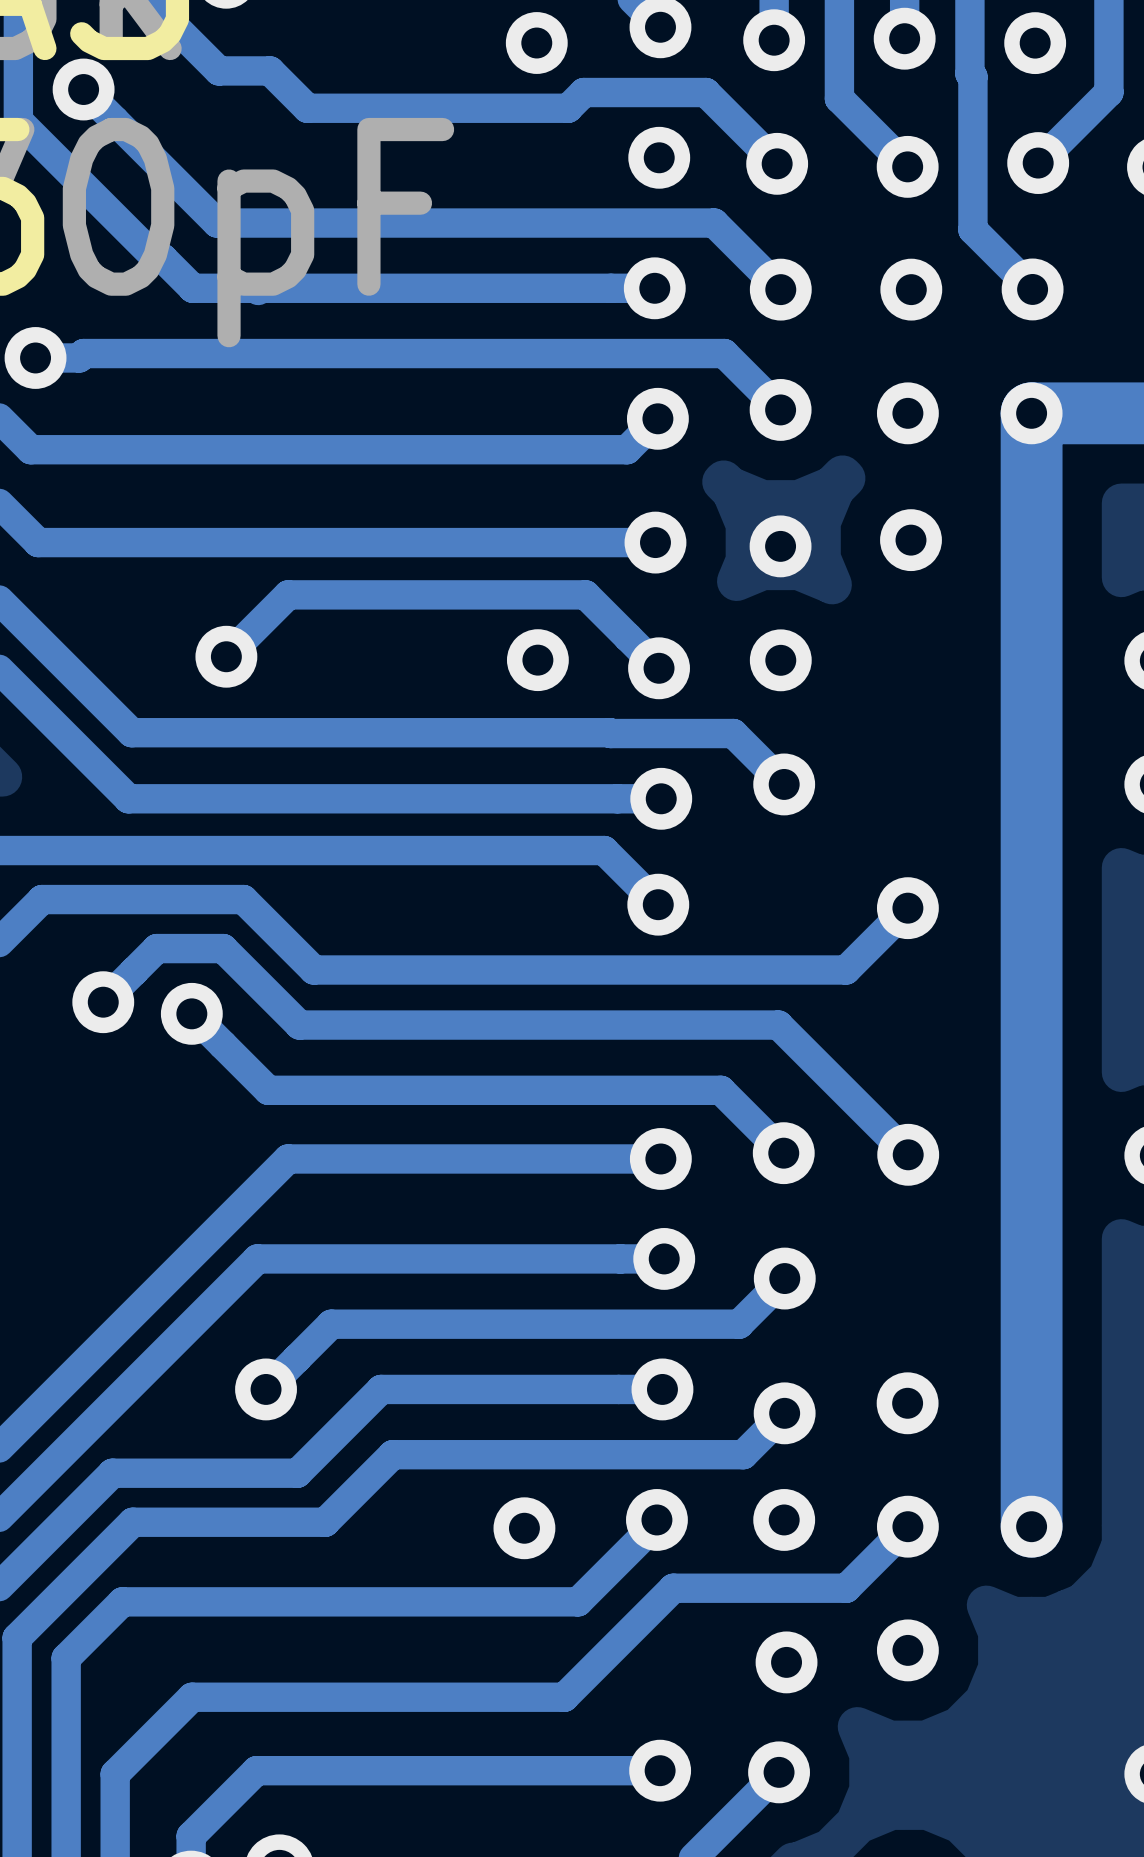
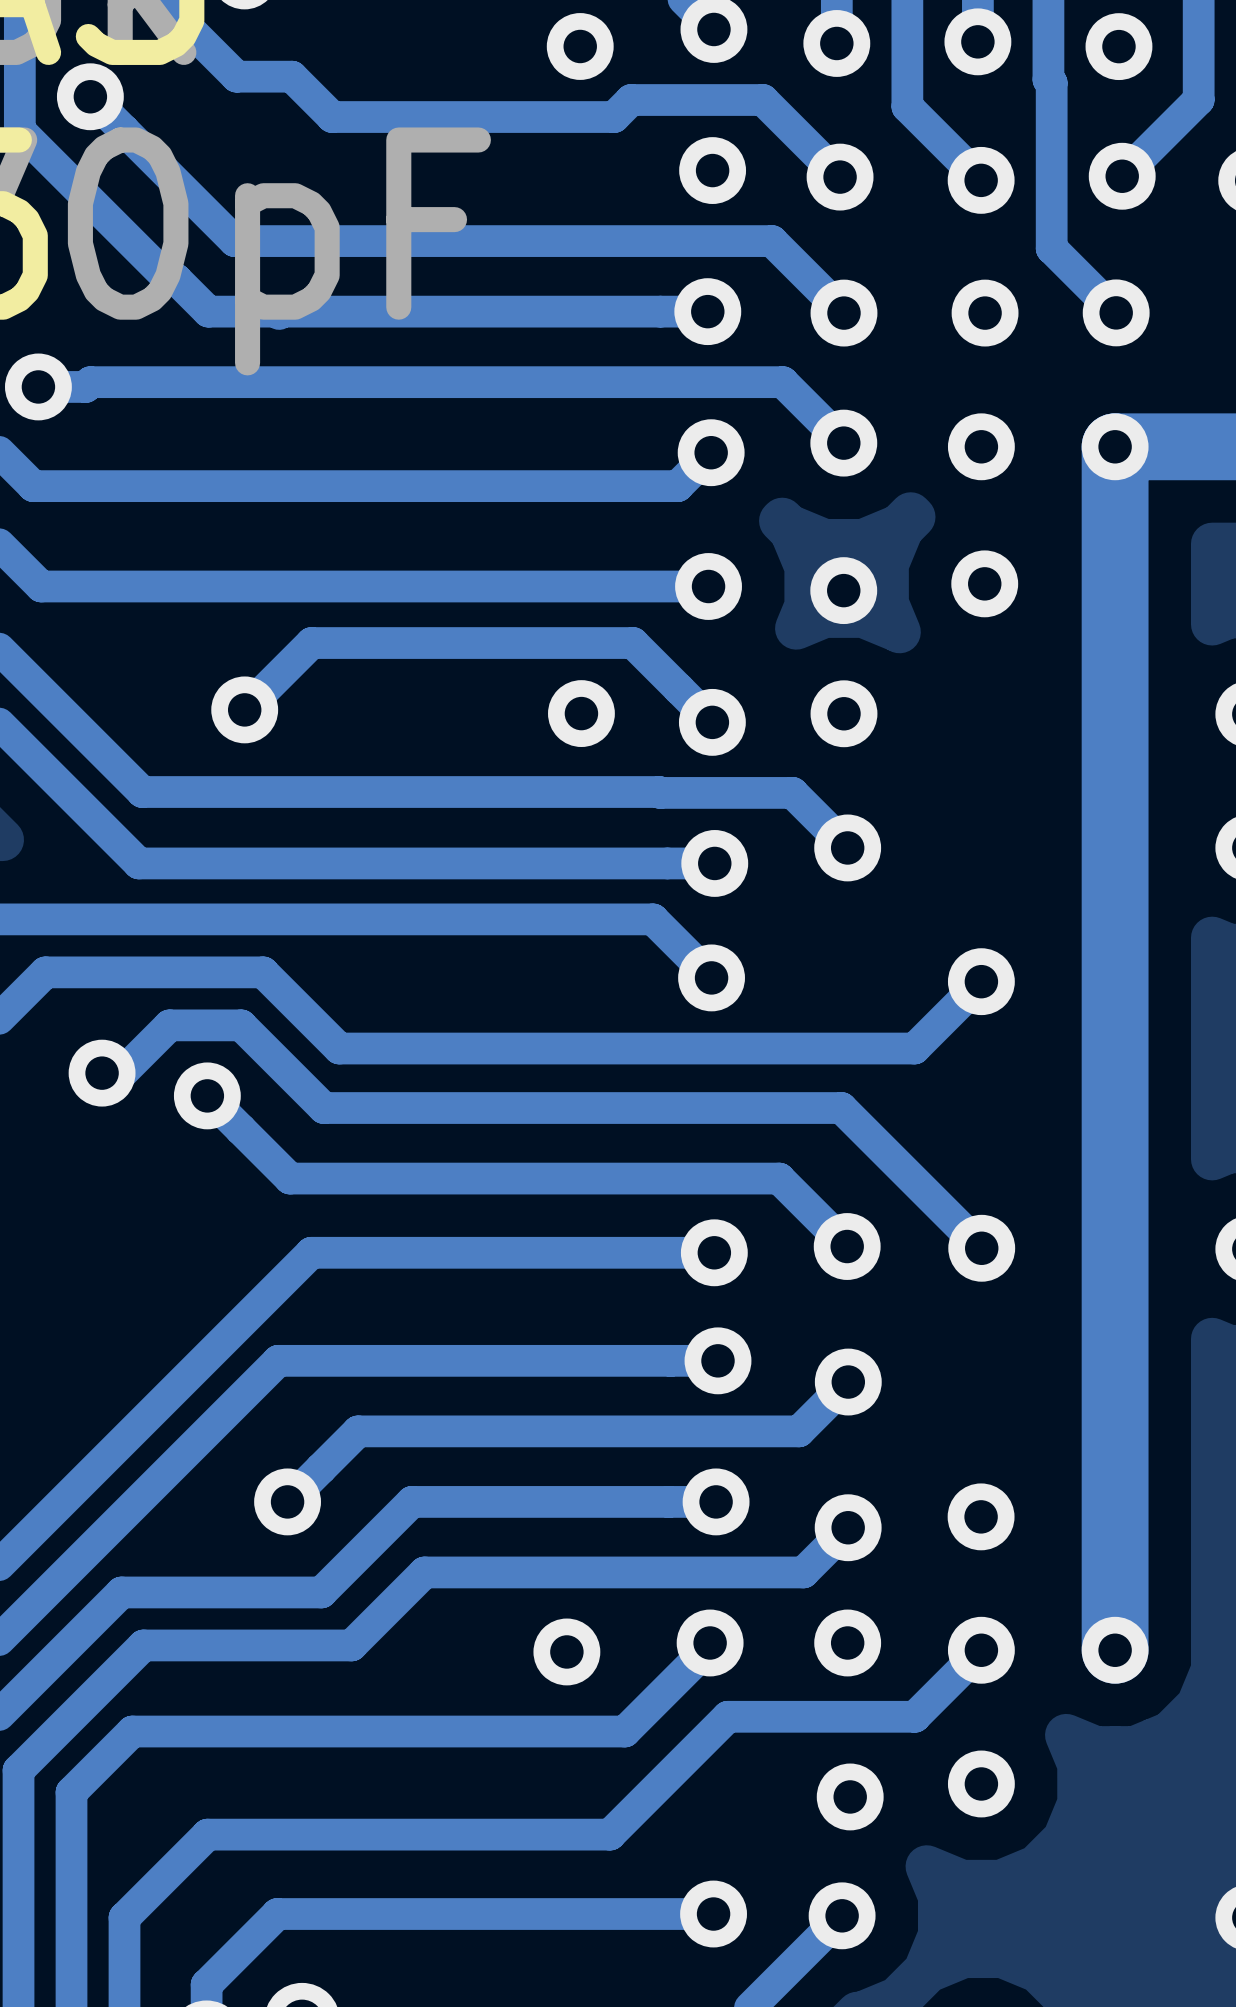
via position: (103, 1002) -> (102, 1073)

